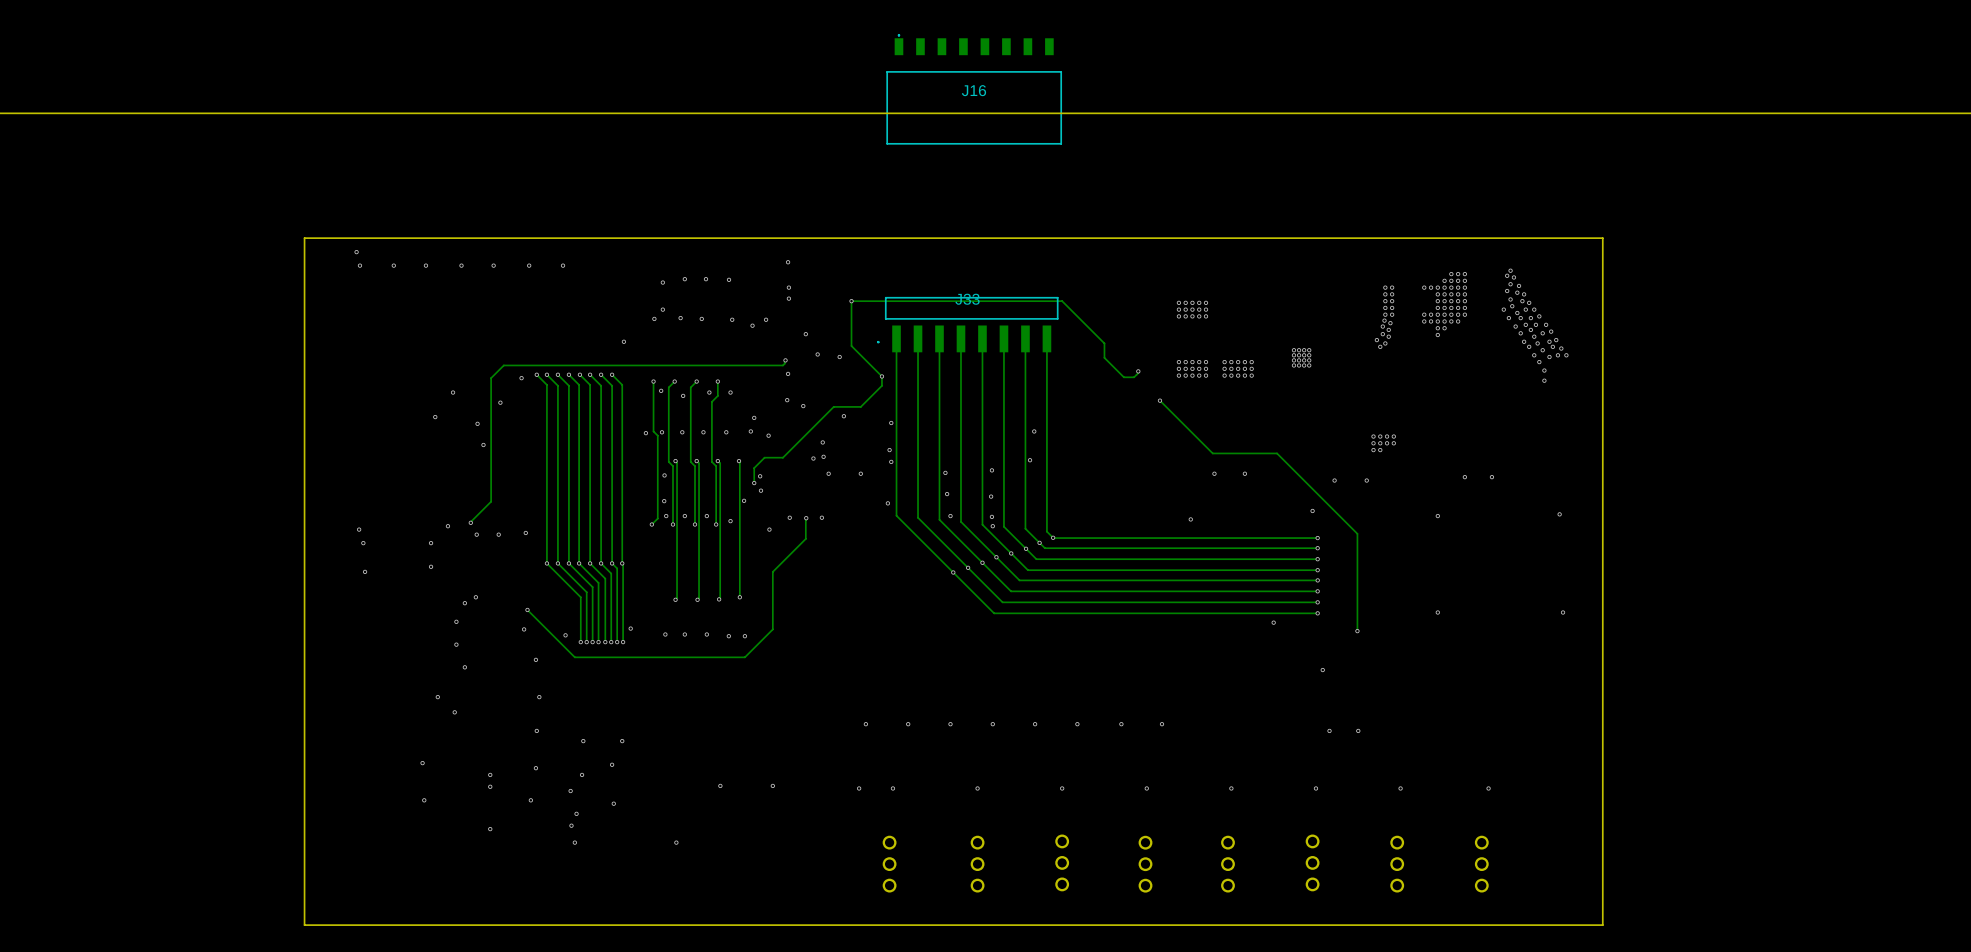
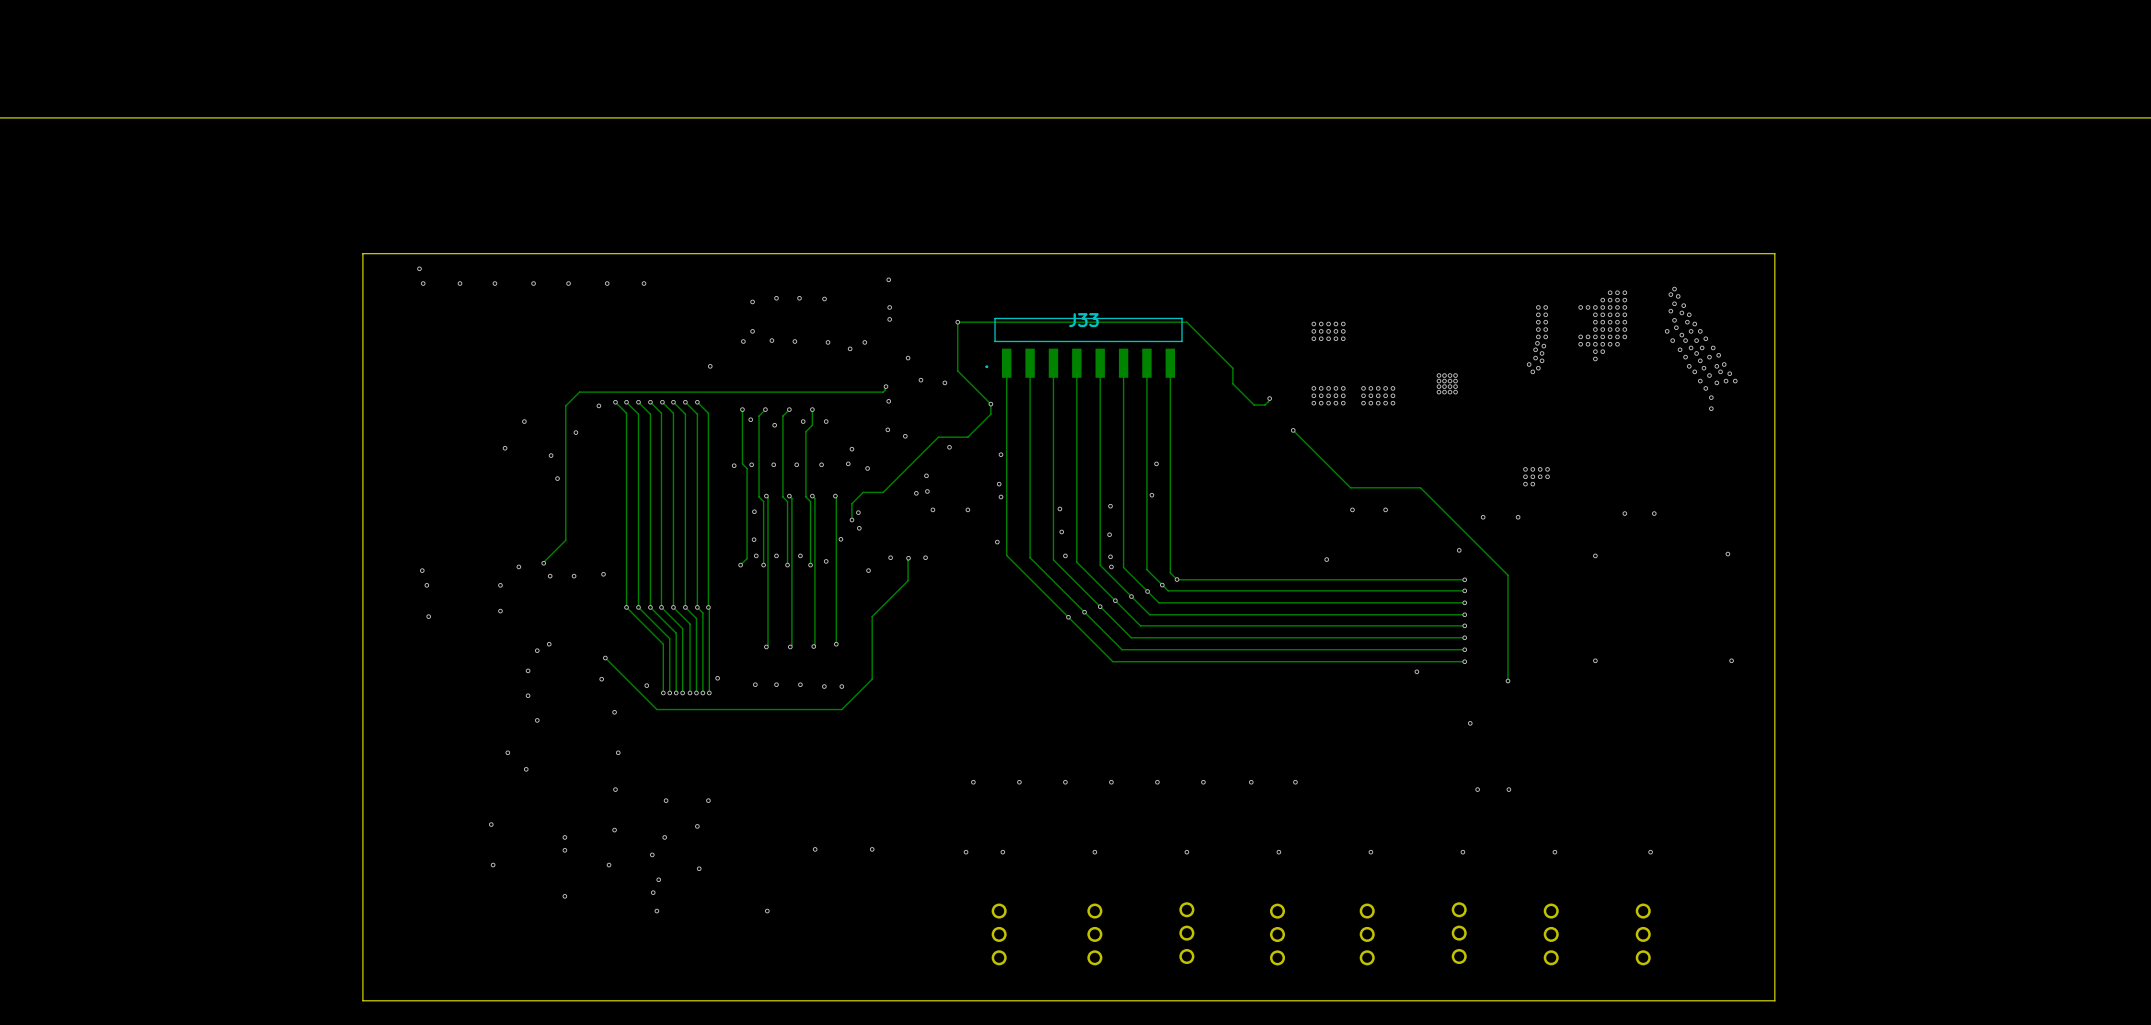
J16: (974, 89) -> none

